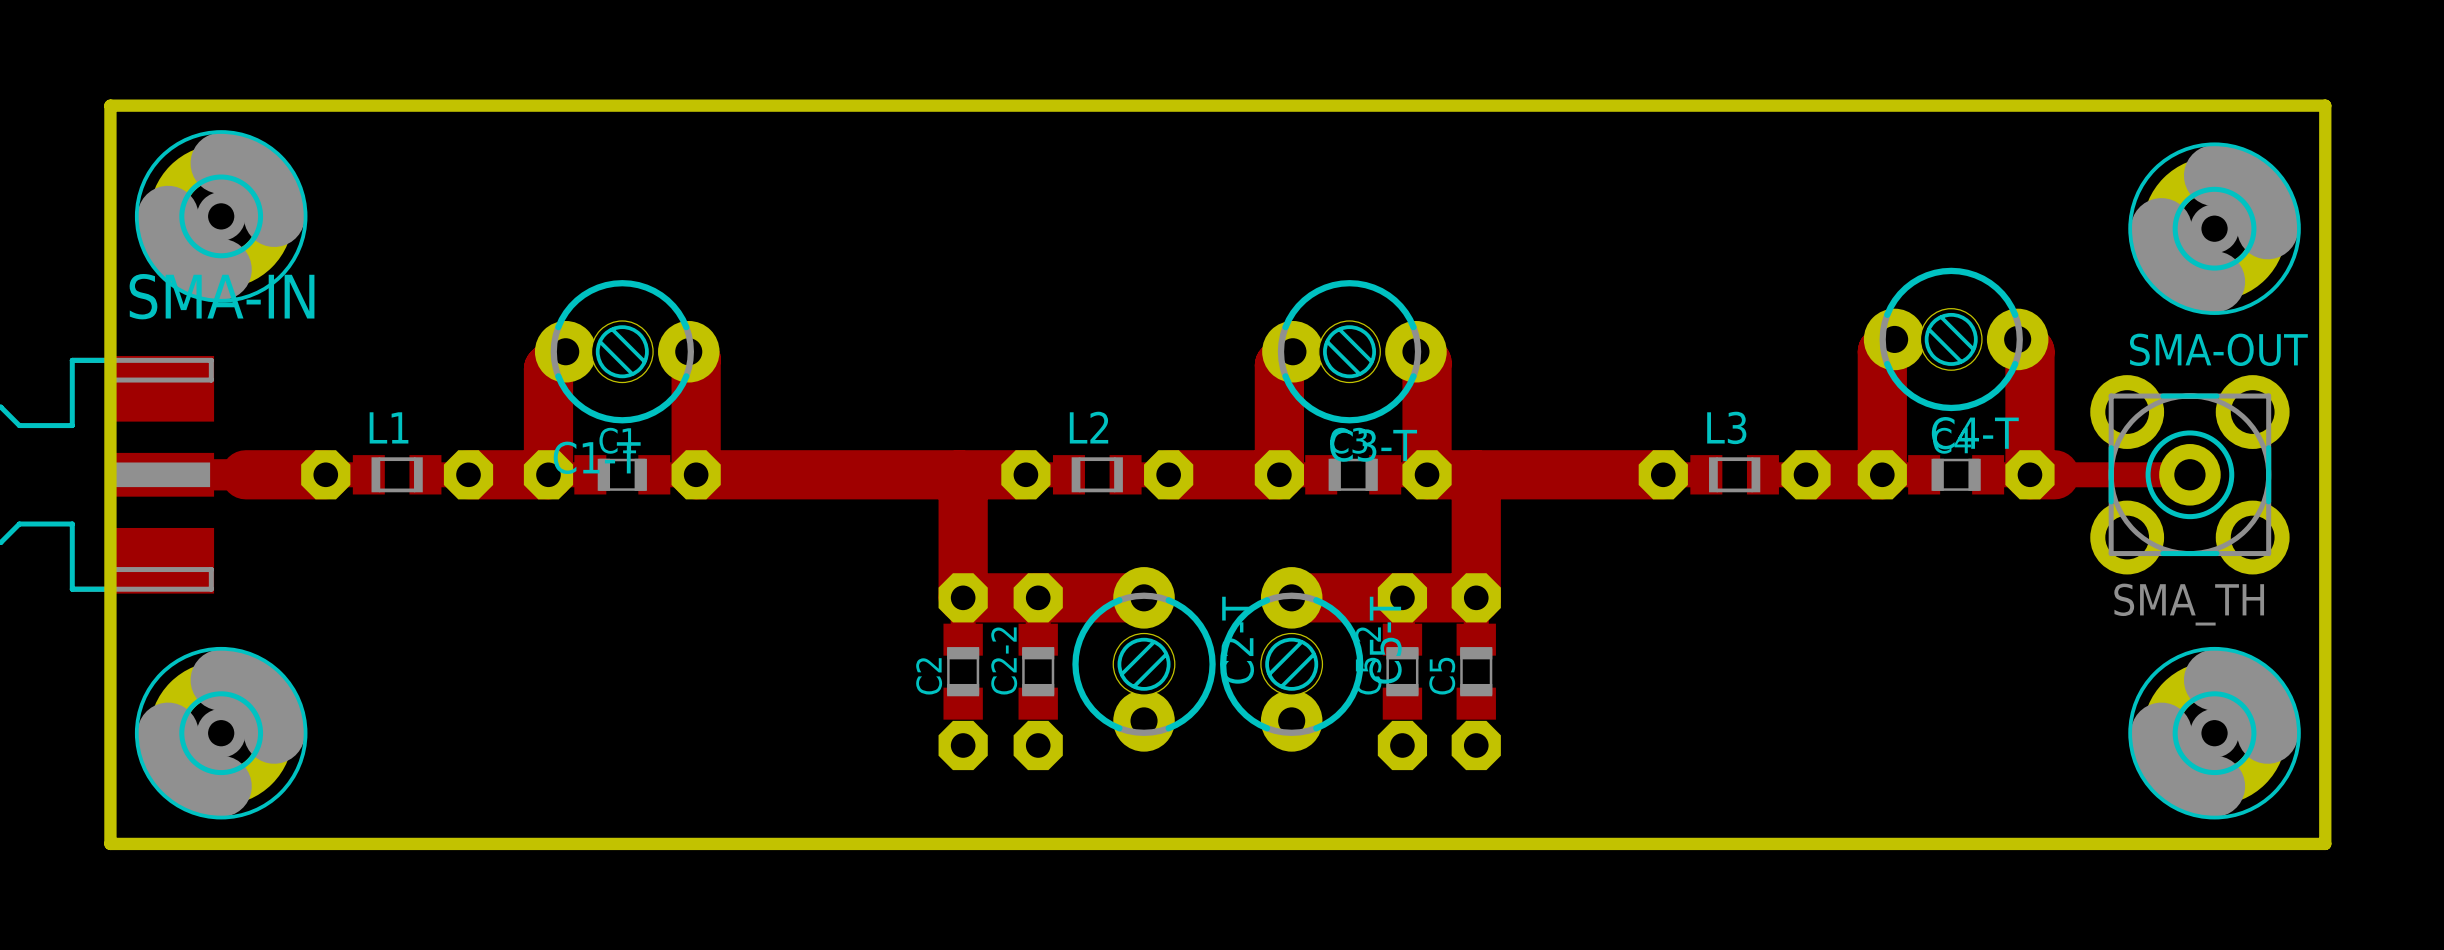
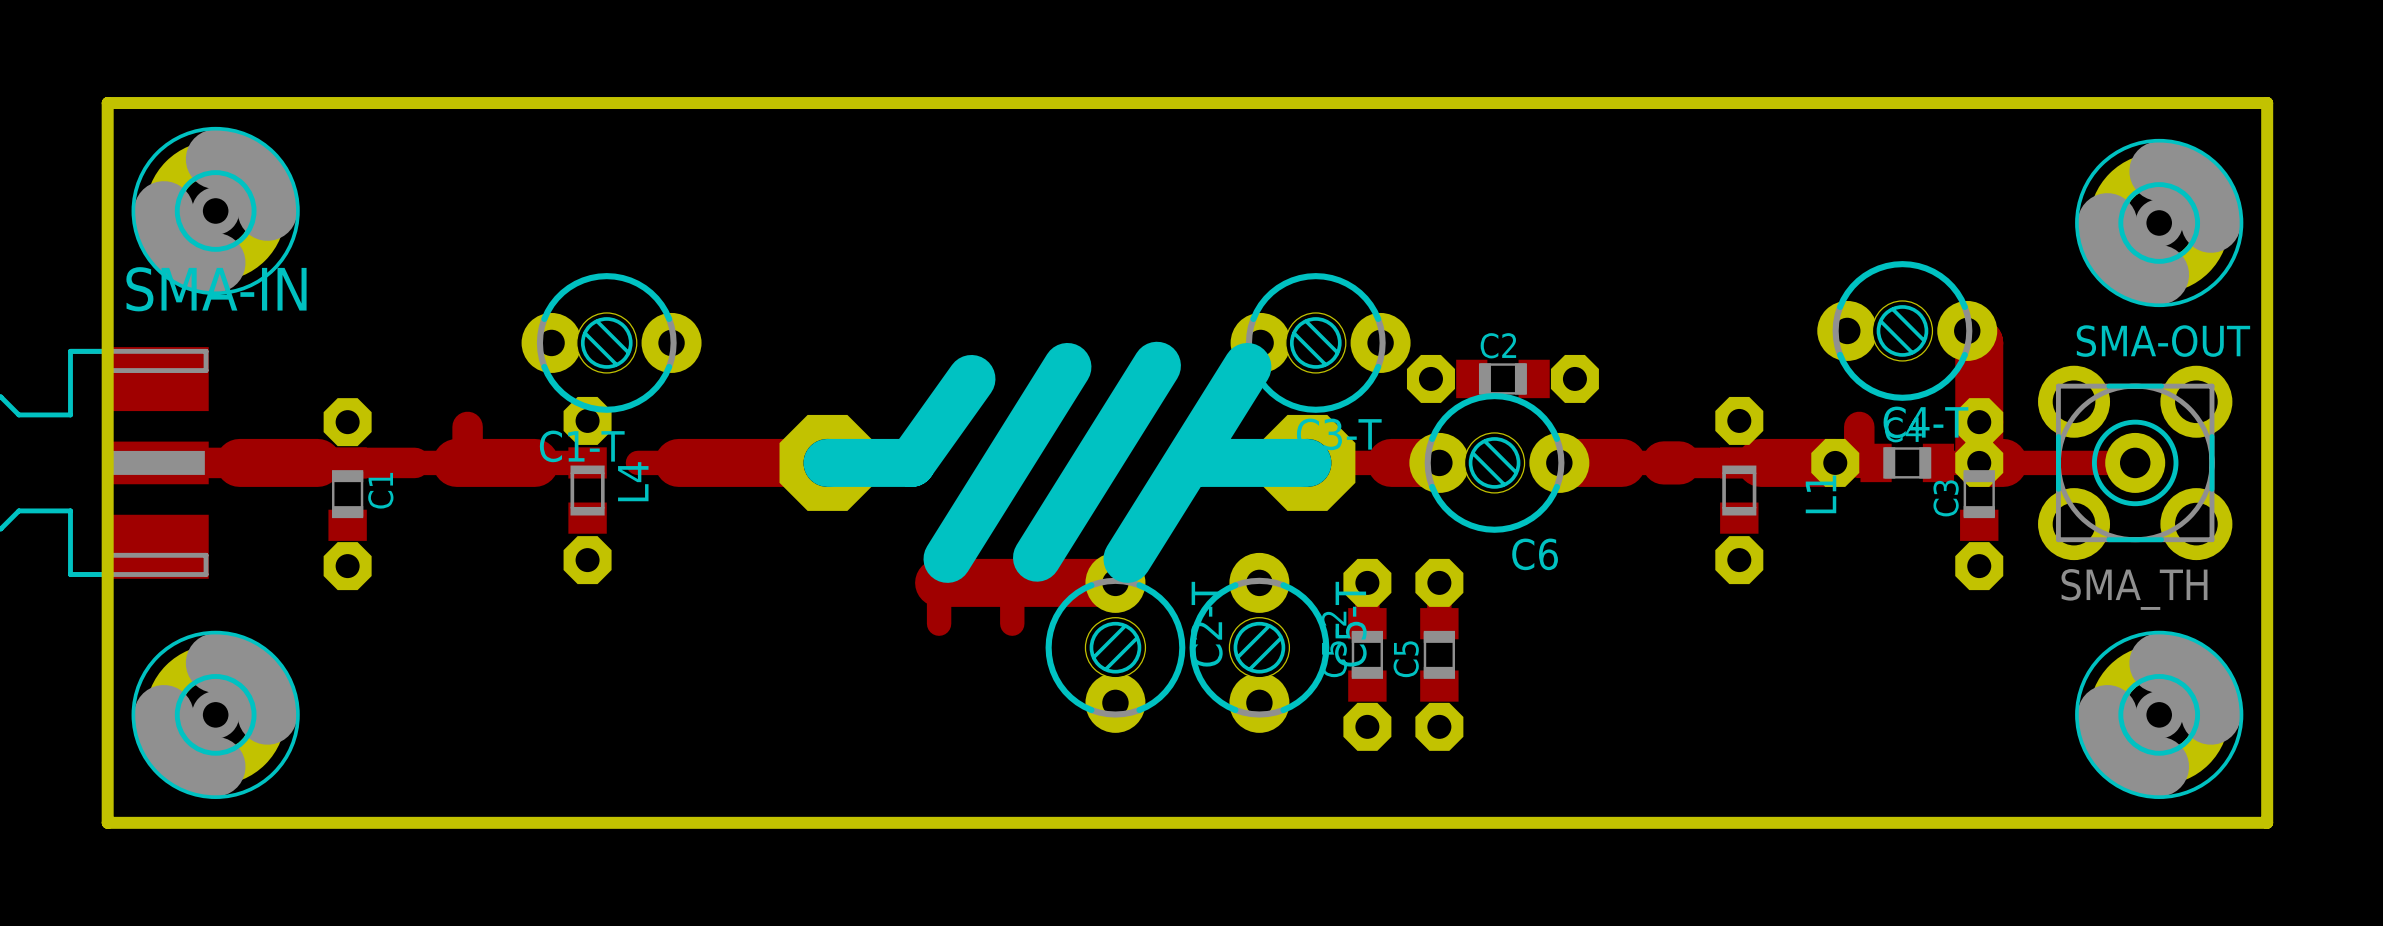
track: (1894, 339) (1882, 351) (1882, 474) -> none
track: (565, 351) (548, 368) (548, 474) -> none
track: (688, 351) (696, 359) (696, 474) -> none
track: (1292, 351) (1279, 365) (1279, 474) -> none
track: (1415, 351) (1427, 362) (1427, 474) -> none
track: none -> (467, 426) (467, 462)
track: none -> (1859, 426) (1859, 462)
track: none -> (359, 462) (414, 462)
L1 rotation: 0° (397, 474) -> 90° clockwise (1739, 490)
L1 position: (397, 474) -> (1739, 490)
C1 rotation: 0° (622, 474) -> 90° clockwise (347, 494)
C1 position: (622, 474) -> (347, 494)
track: (848, 474) (1068, 474) -> none
track: (959, 474) (963, 478) (963, 597) -> none
part: none -> (1067, 462)
L2: (1097, 474) -> none
track: (1125, 474) (1279, 474) -> none
C3 rotation: 0° (1353, 474) -> 90° clockwise (1979, 494)
C3 position: (1353, 474) -> (1979, 494)
C6: none -> (1499, 462)
track: (1599, 474) (1476, 474) (1476, 597) (1291, 597) -> none
track: none -> (1663, 462) (1718, 462)
L3: (1734, 474) -> none
L4: none -> (587, 490)
C2 rotation: 0° (963, 671) -> 90° clockwise (1502, 378)
C2 position: (963, 671) -> (1502, 378)
C2-2: (1038, 671) -> none

